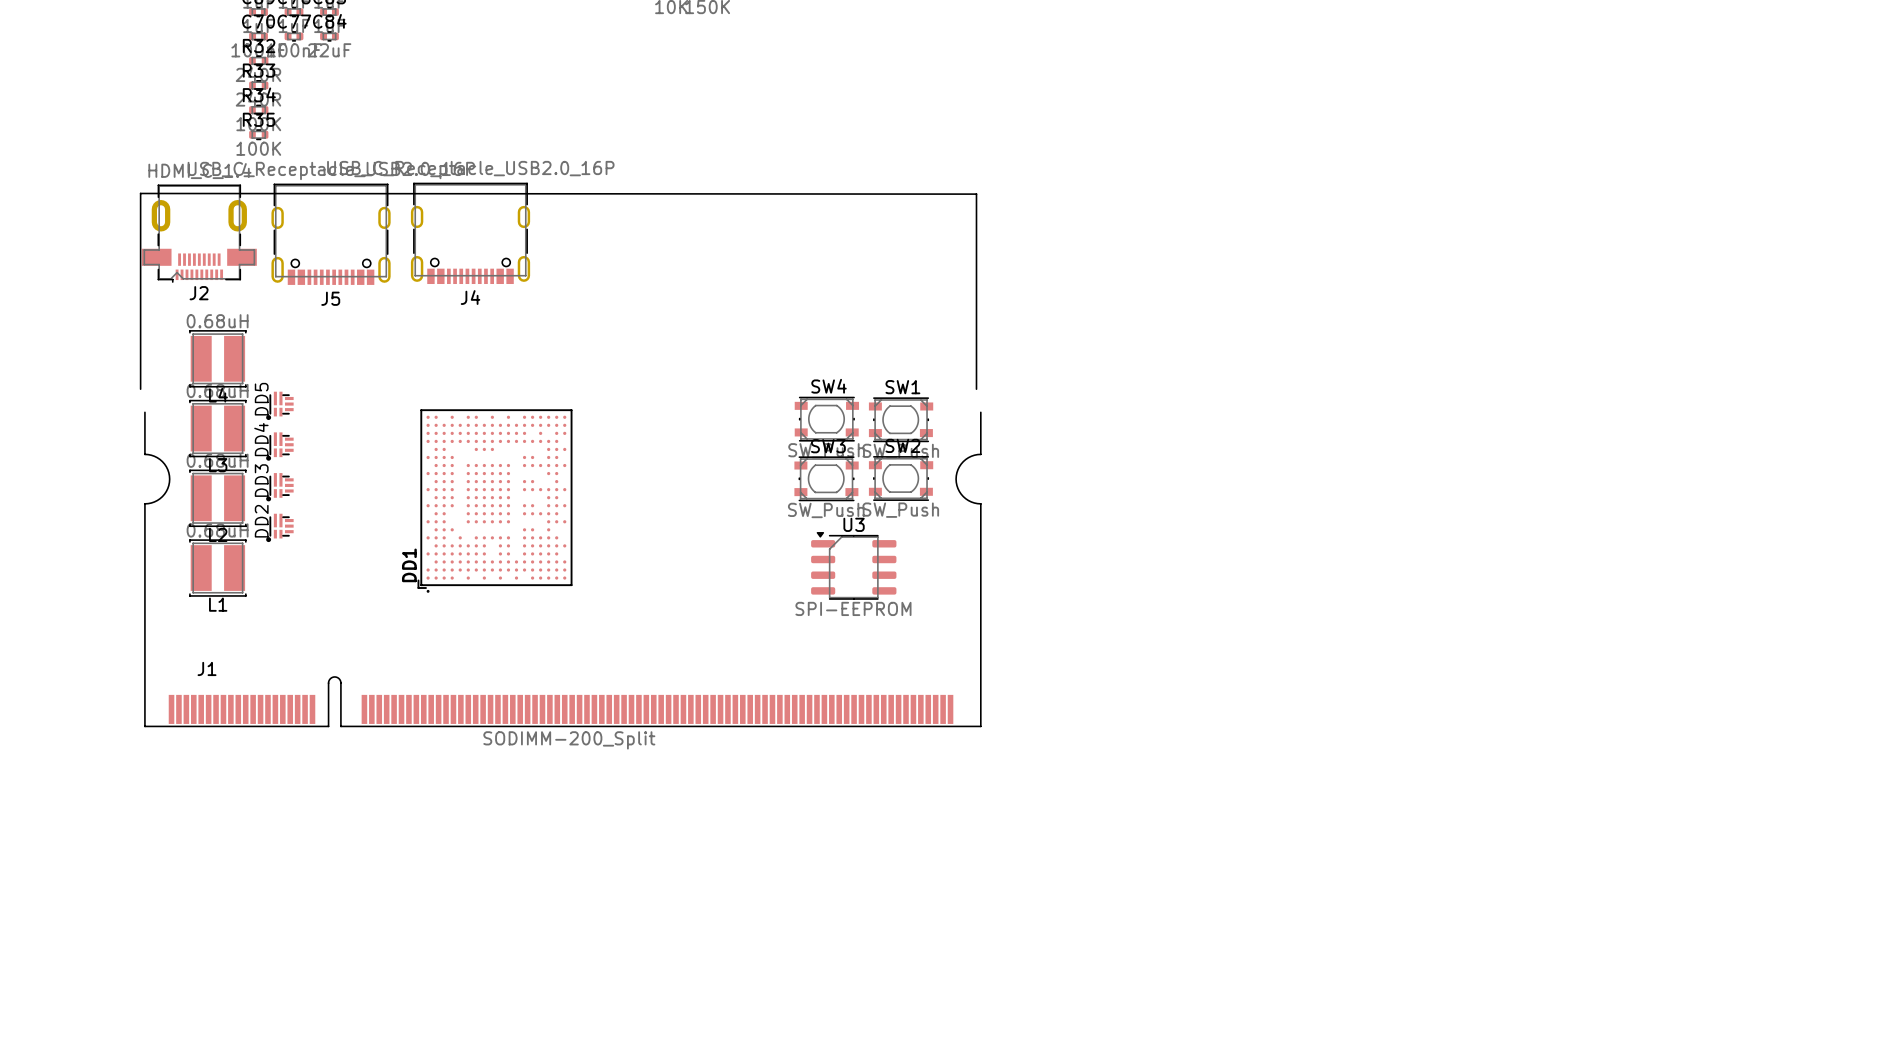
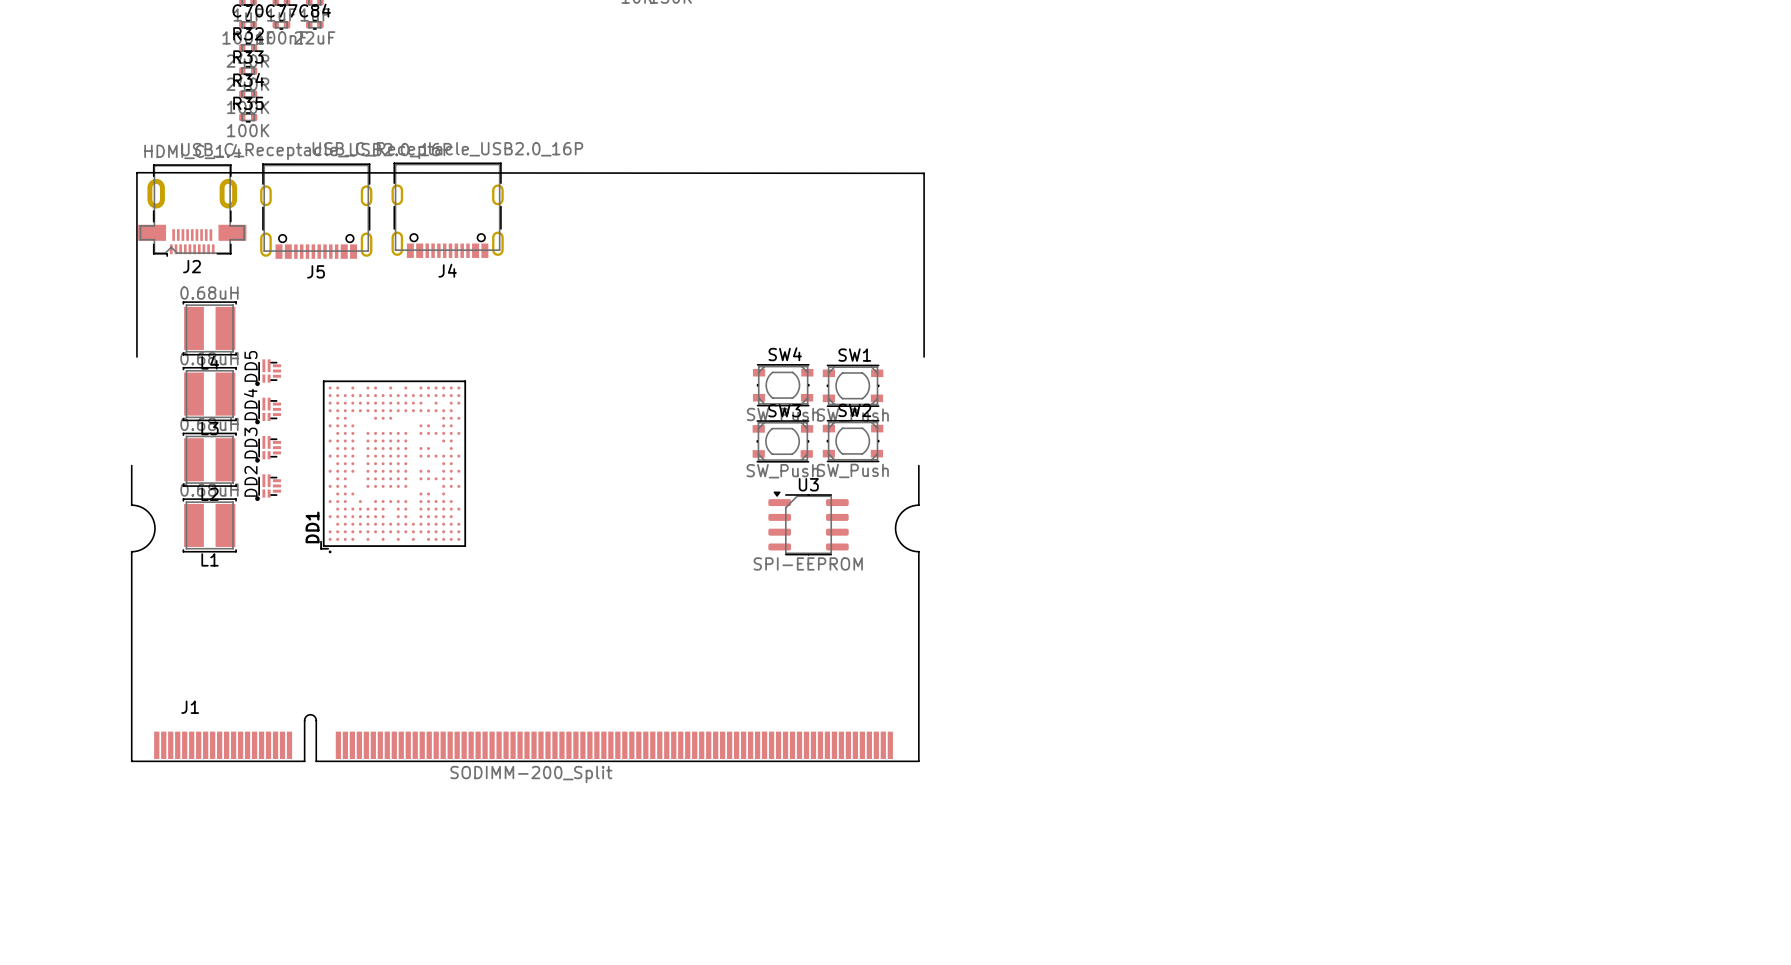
DD1 position: (495, 500) -> (393, 466)
J1 position: (562, 569) -> (525, 613)

